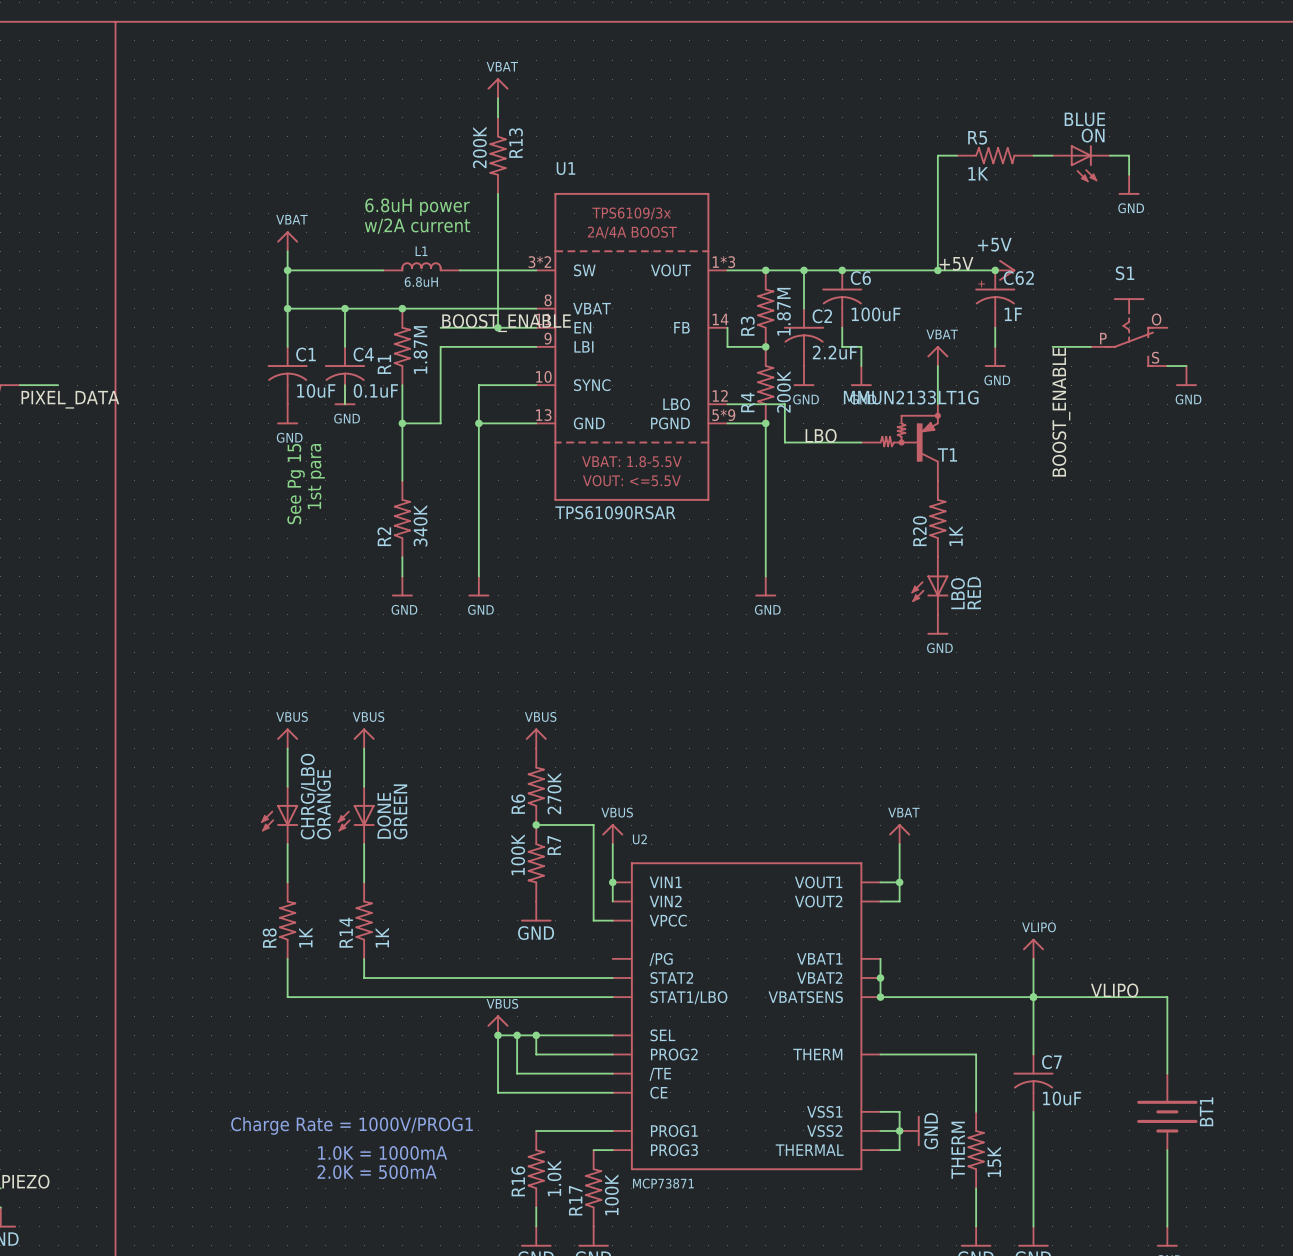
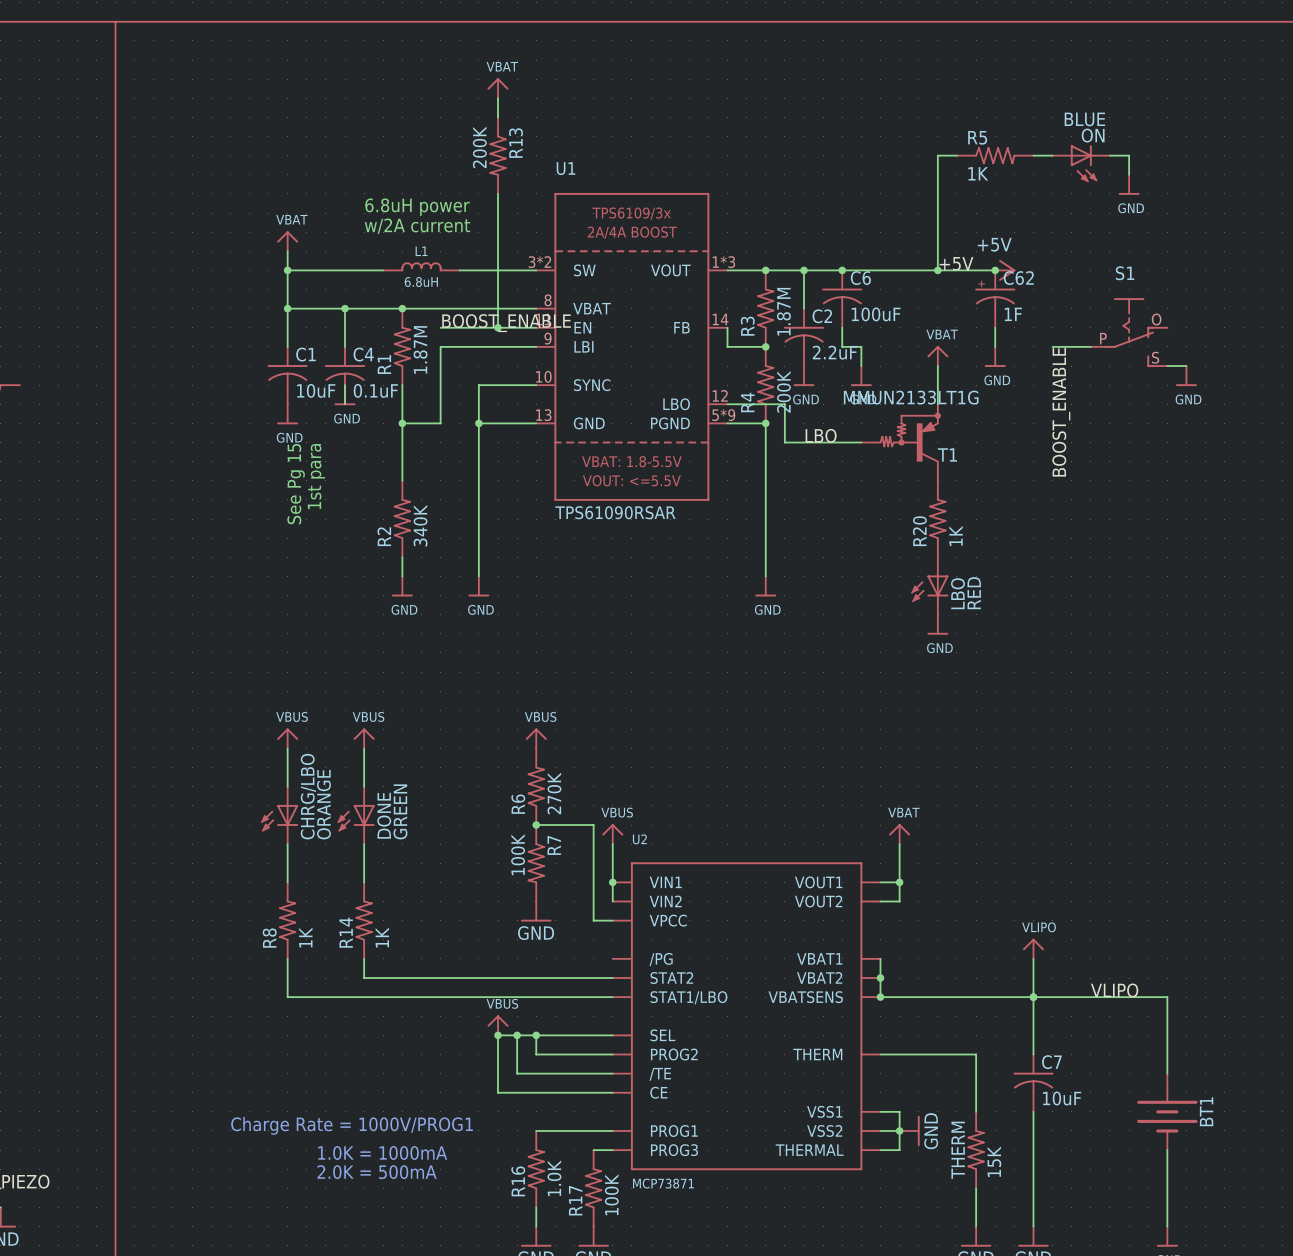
wire: (19, 385) (58, 385) -> none
label: PIXEL_DATA (70, 399) -> none

